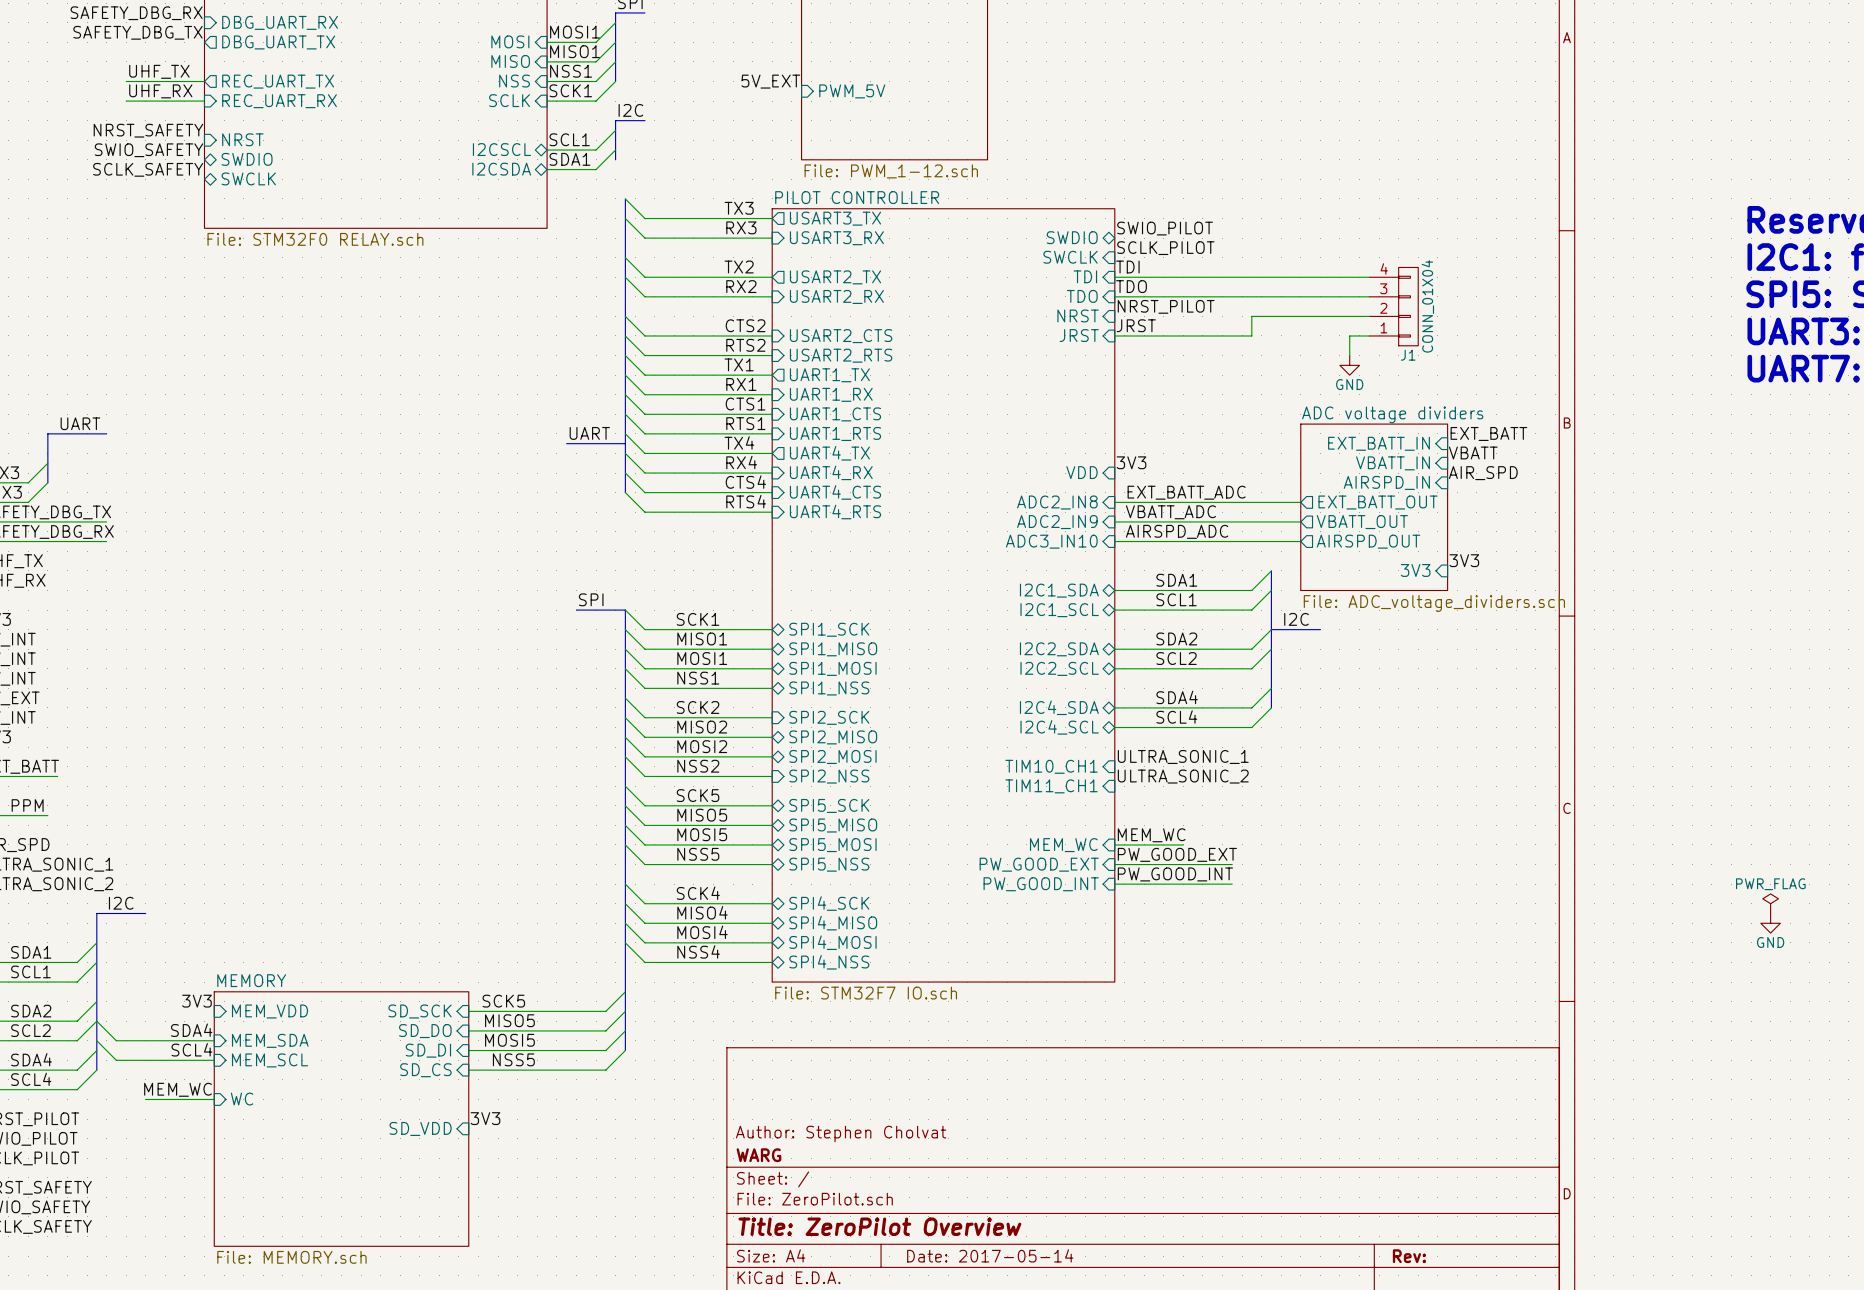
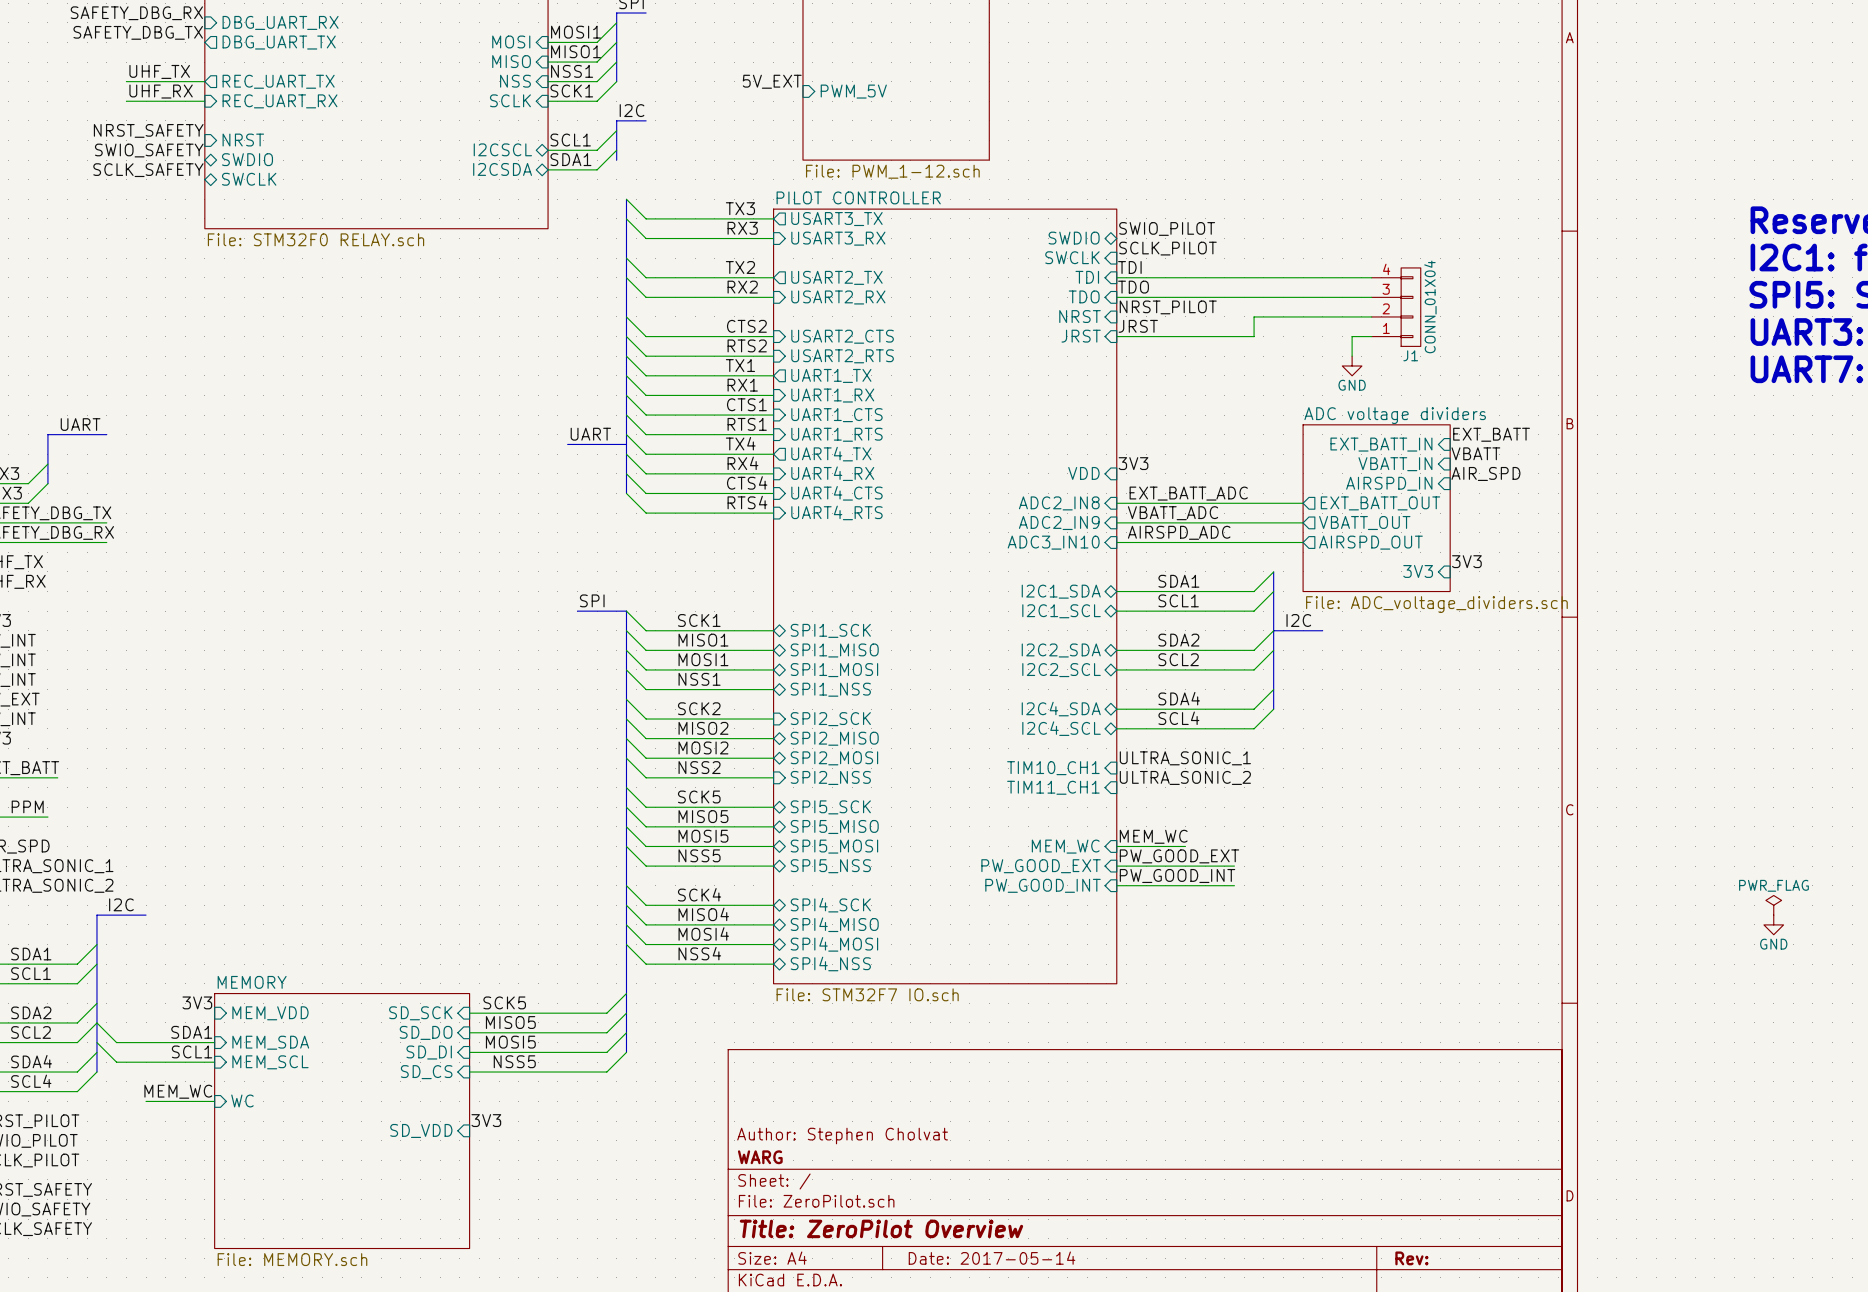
label: SDA4 (191, 1030) -> SDA1 (191, 1032)
label: SCL4 (191, 1049) -> SCL1 (192, 1051)

